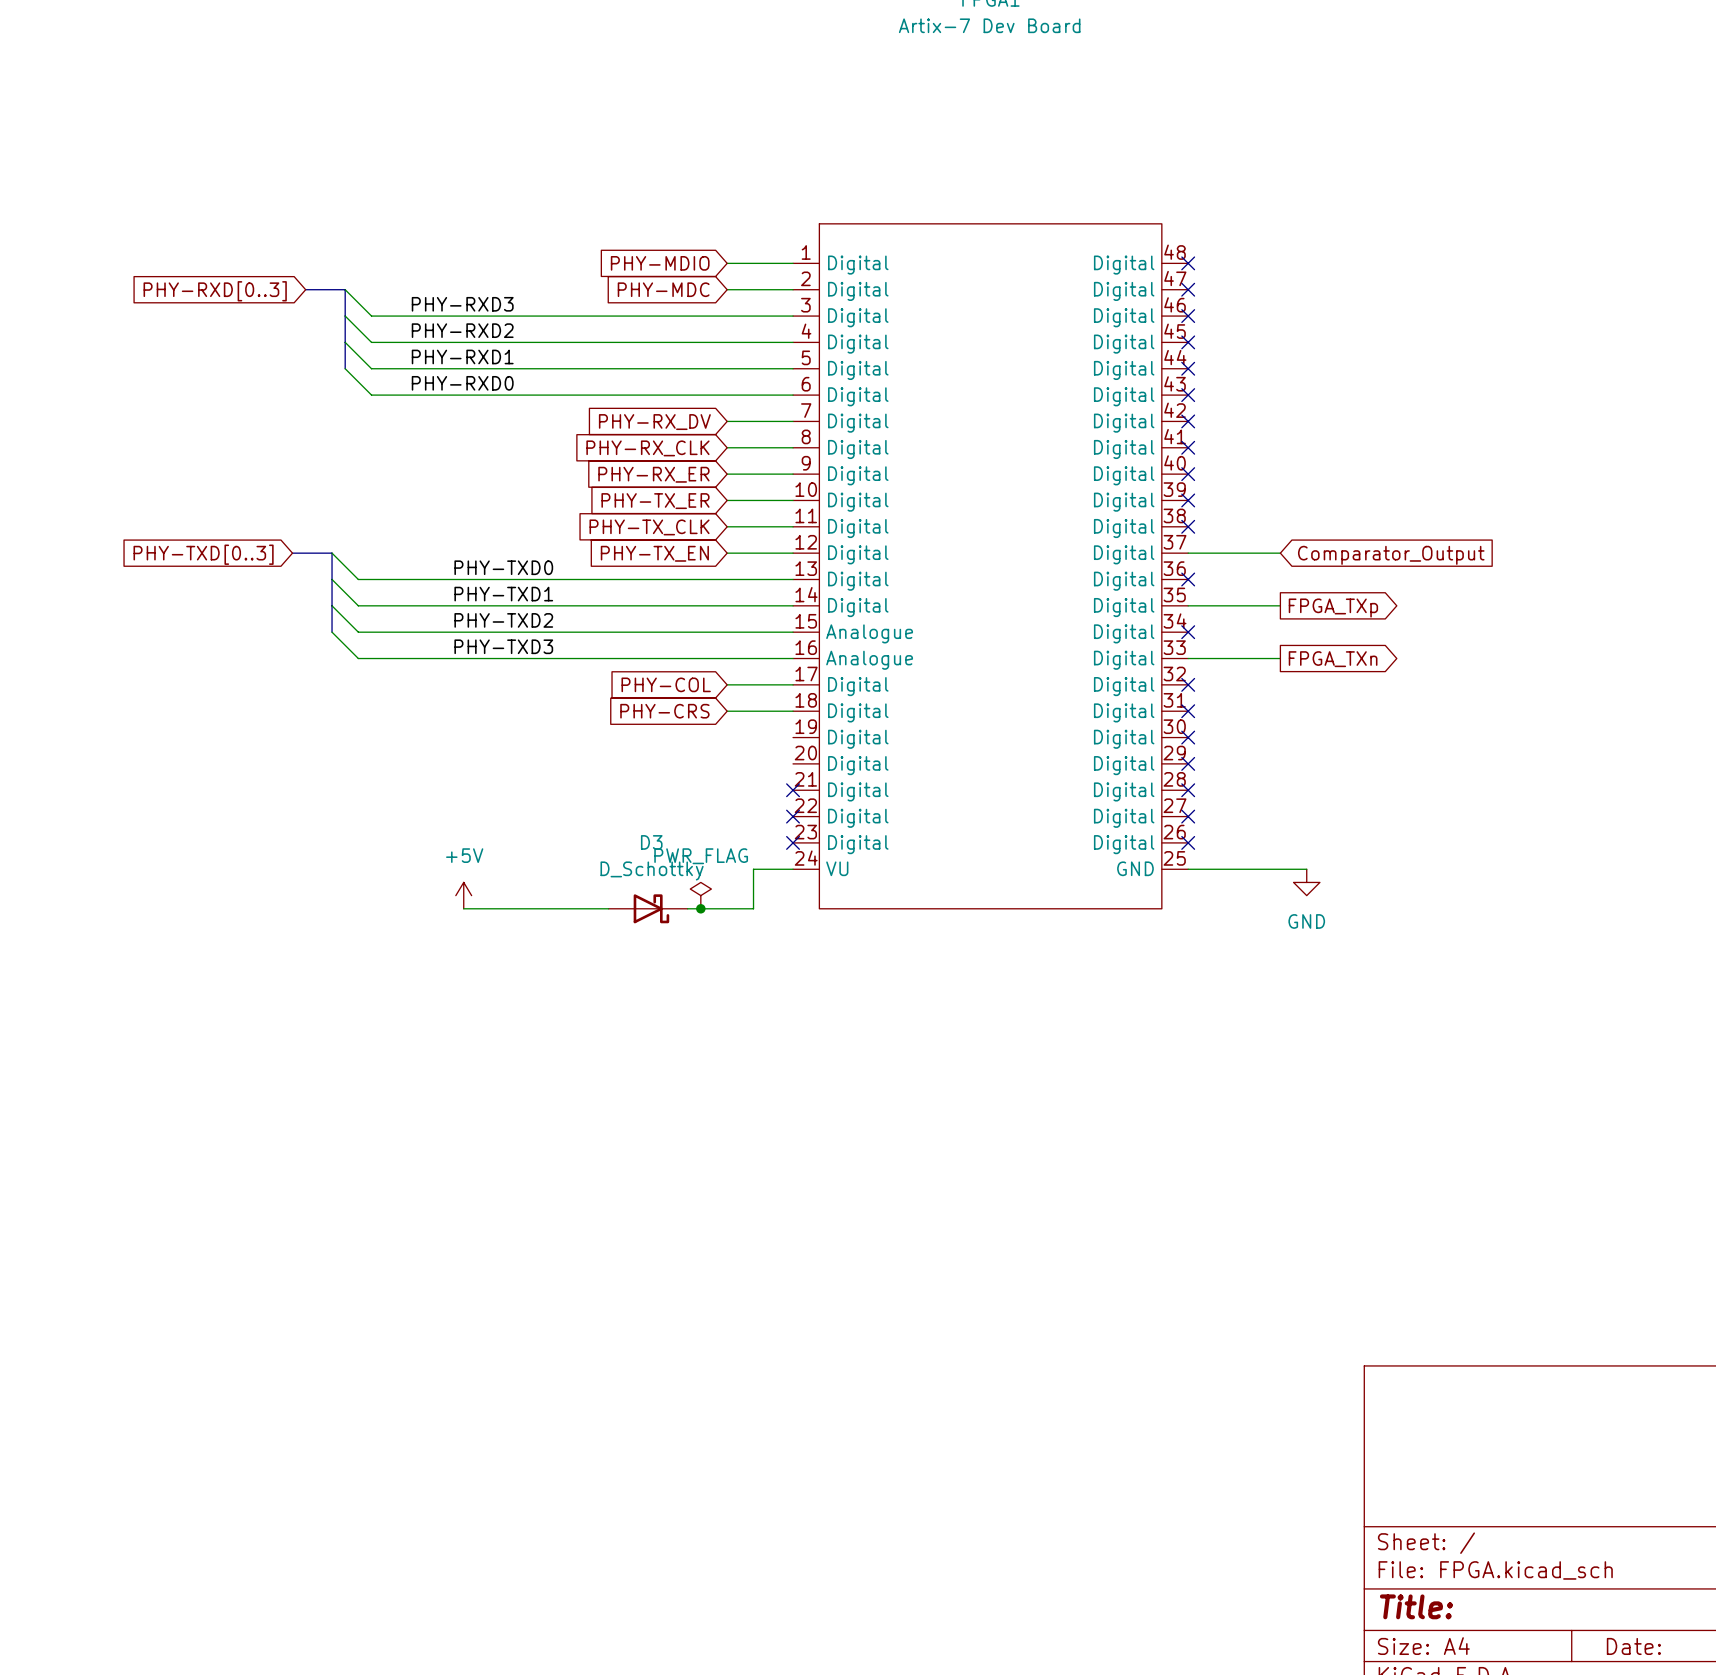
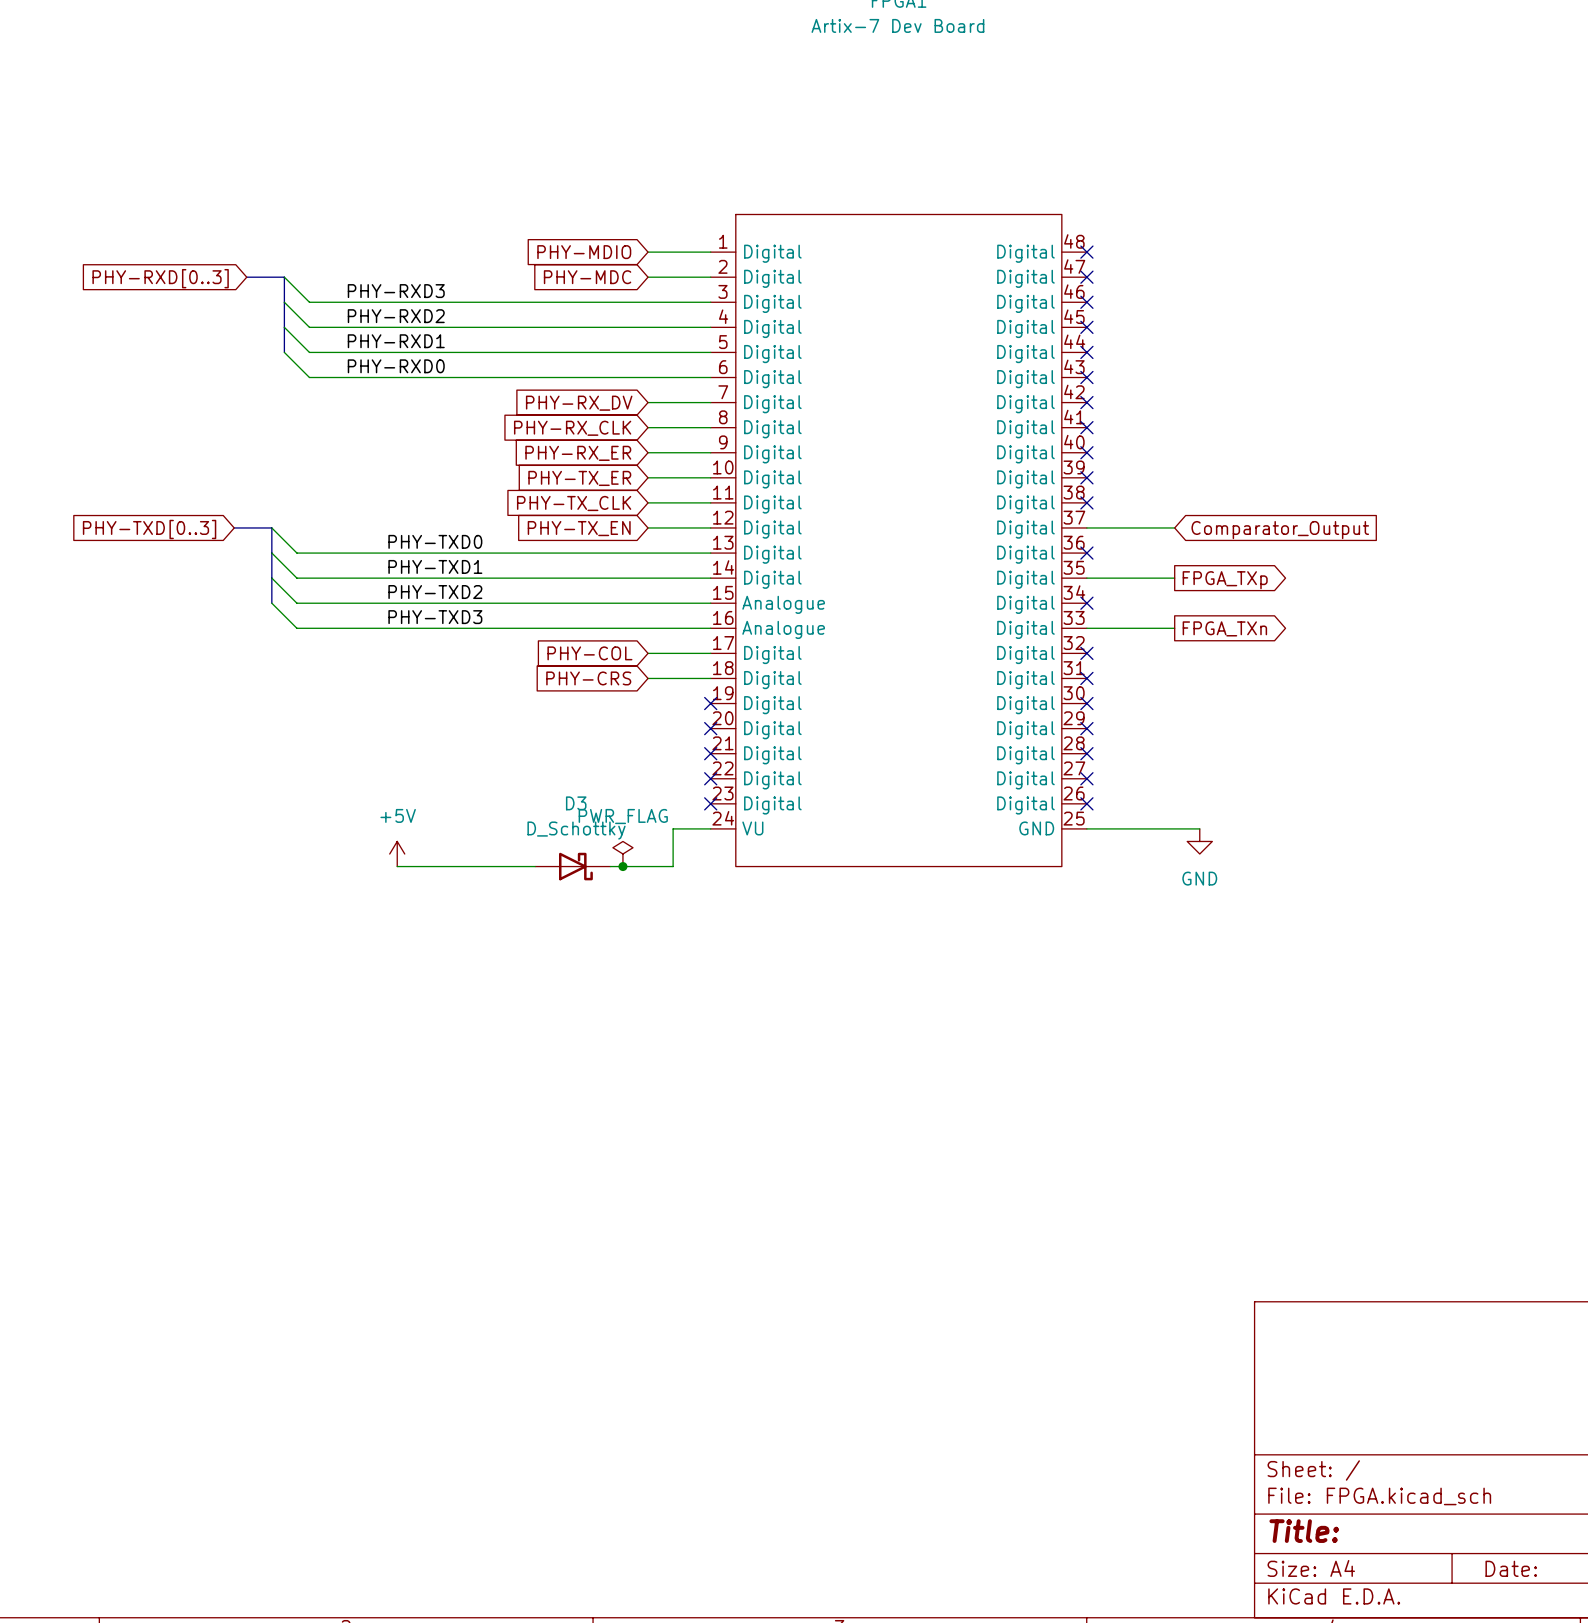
no-connect mark: none -> (710, 703)
no-connect mark: none -> (710, 728)

